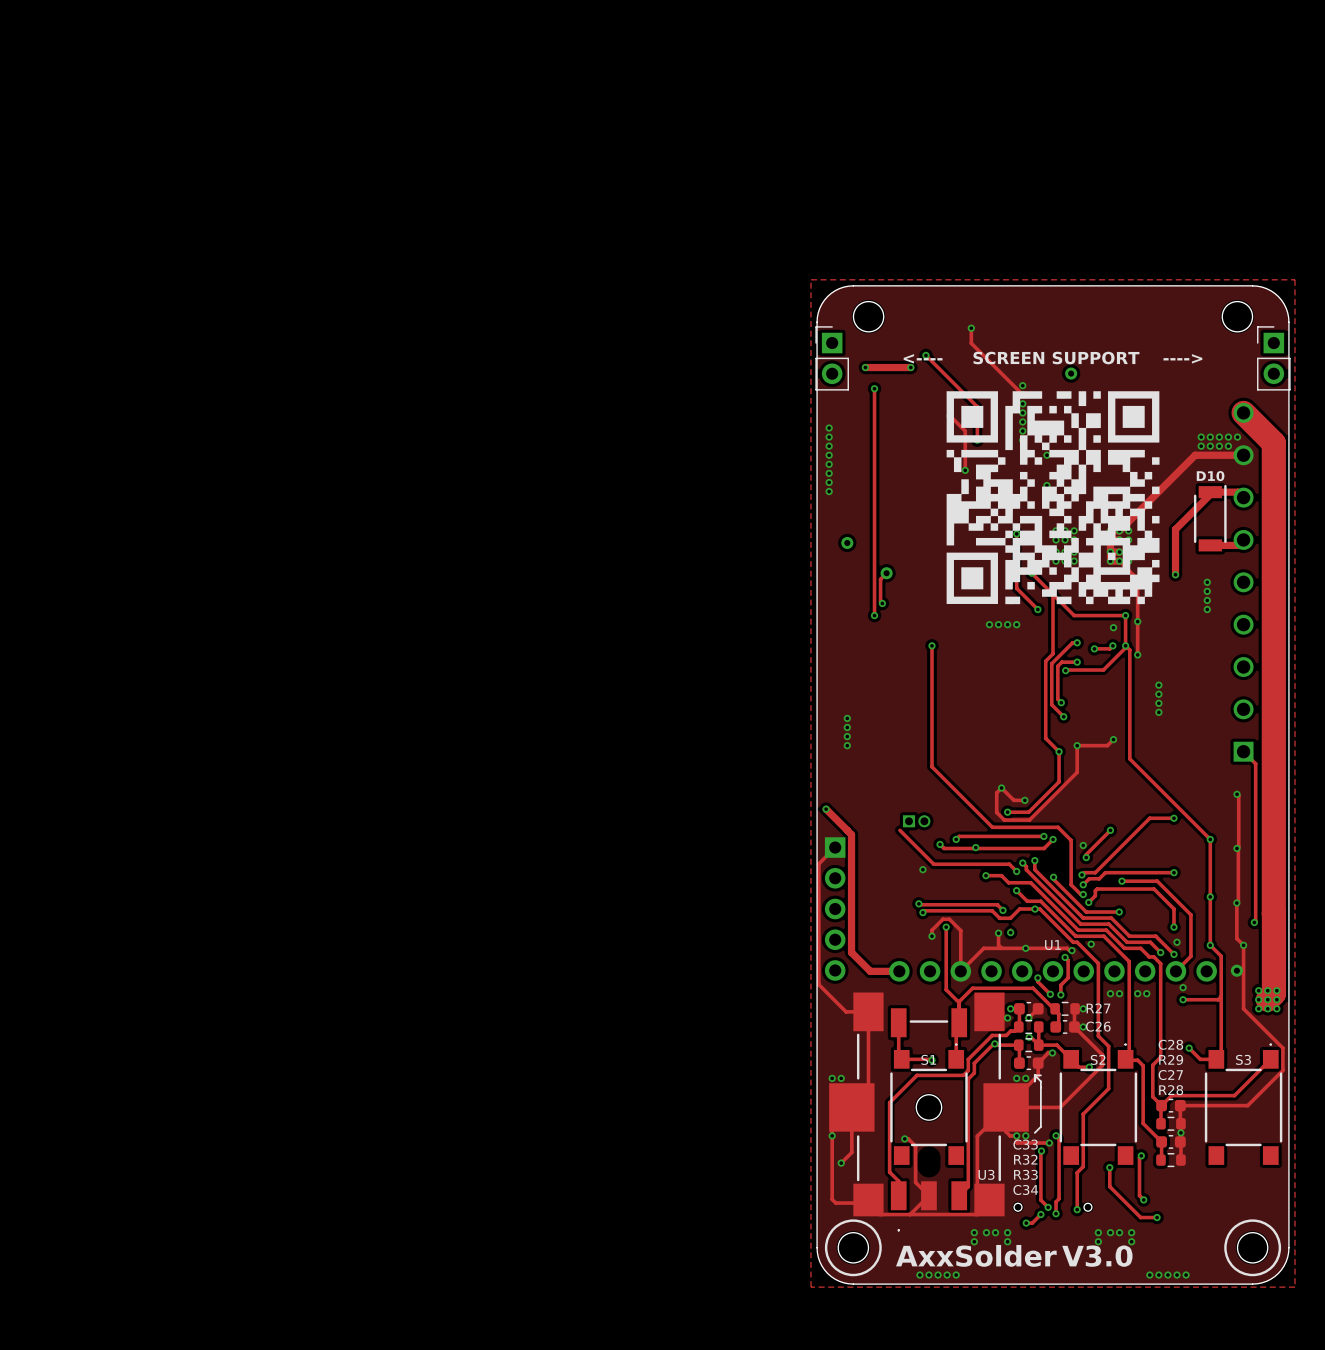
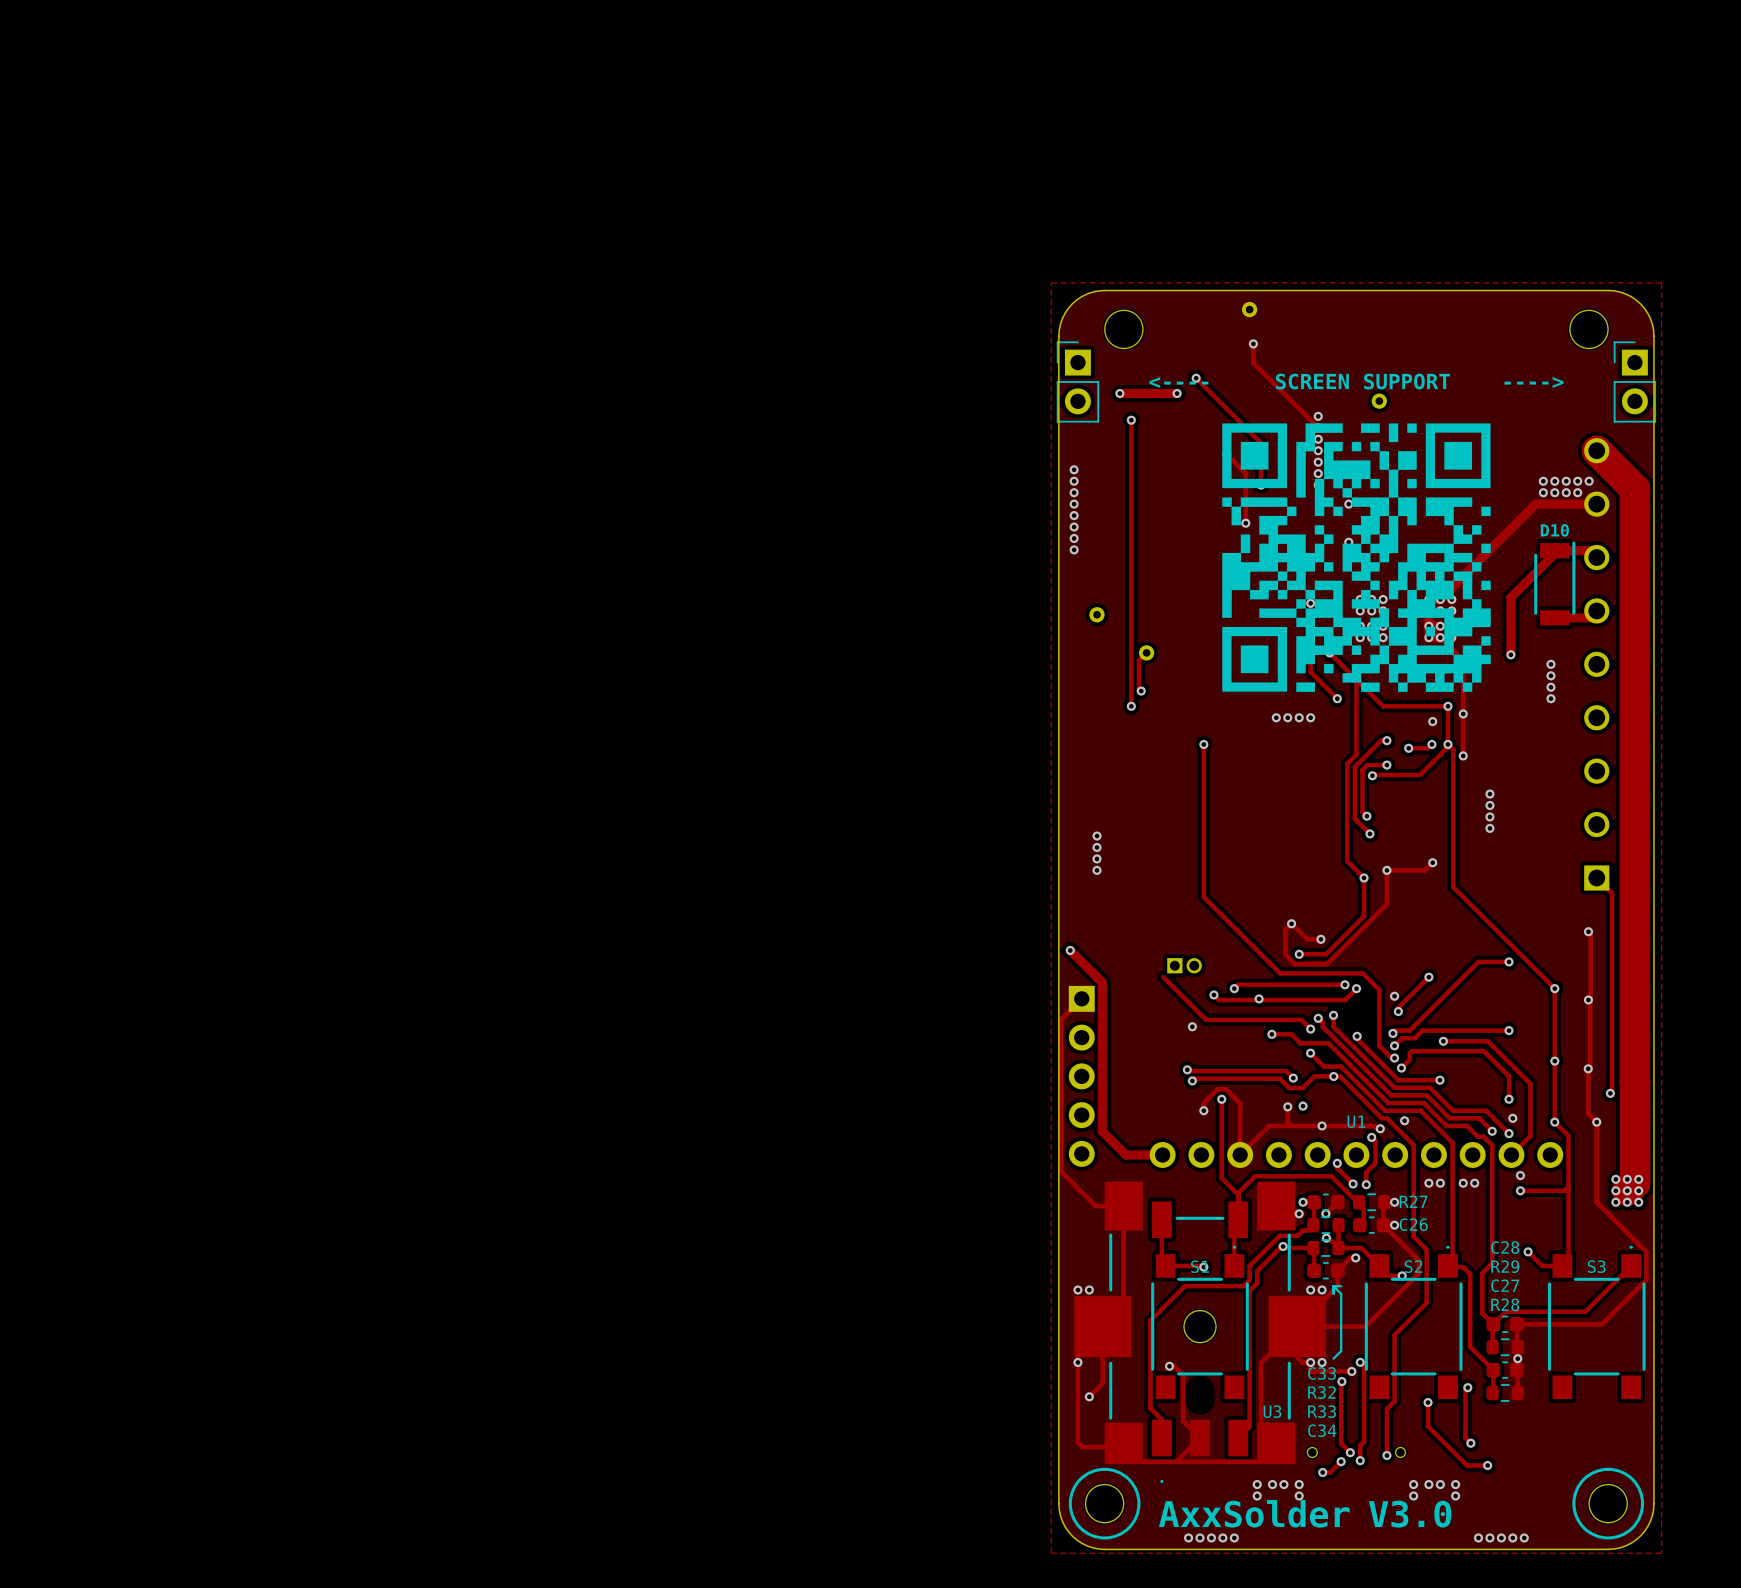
part: none -> (1249, 309)
part: (1236, 970) -> none

